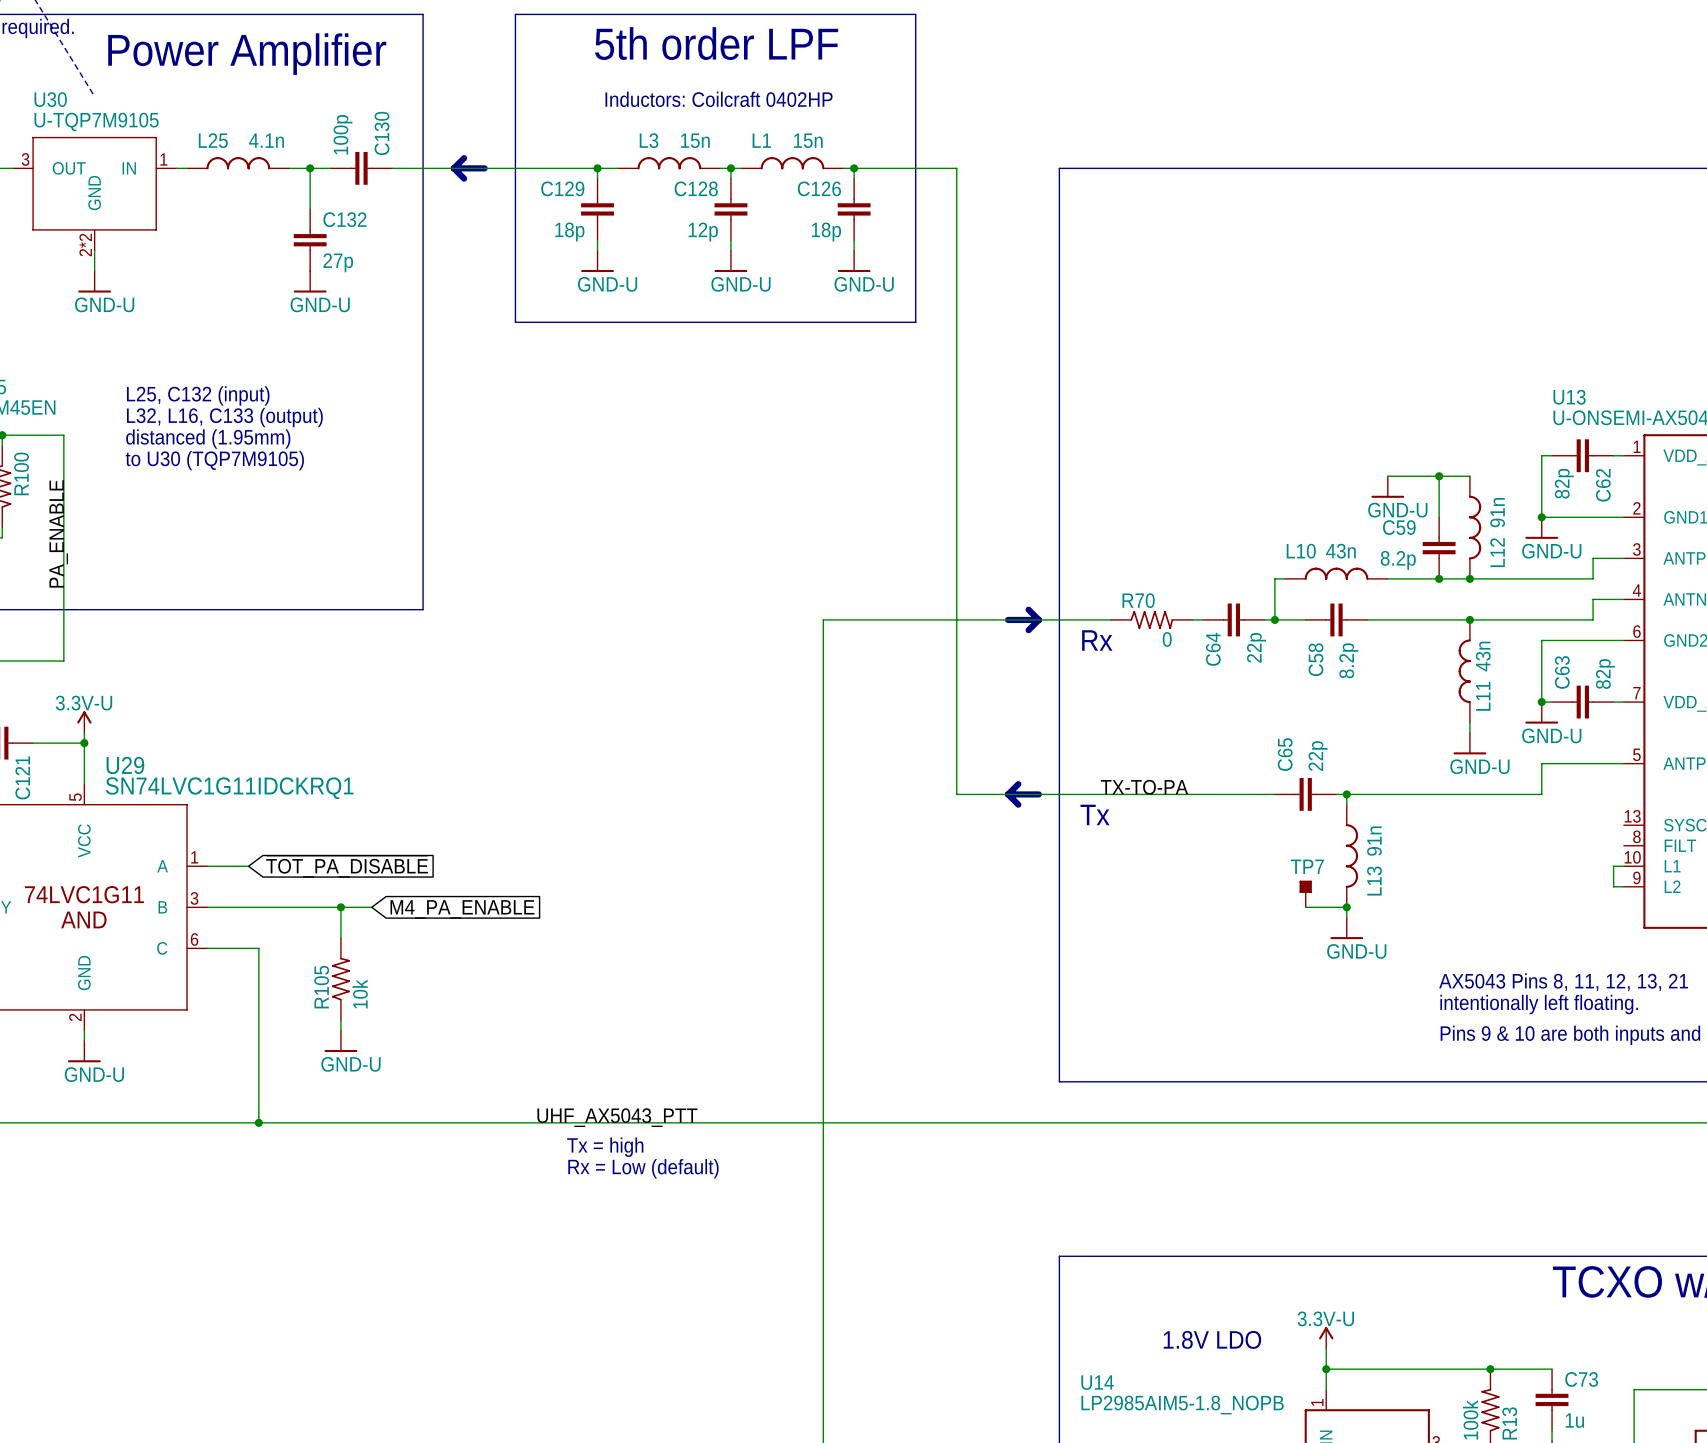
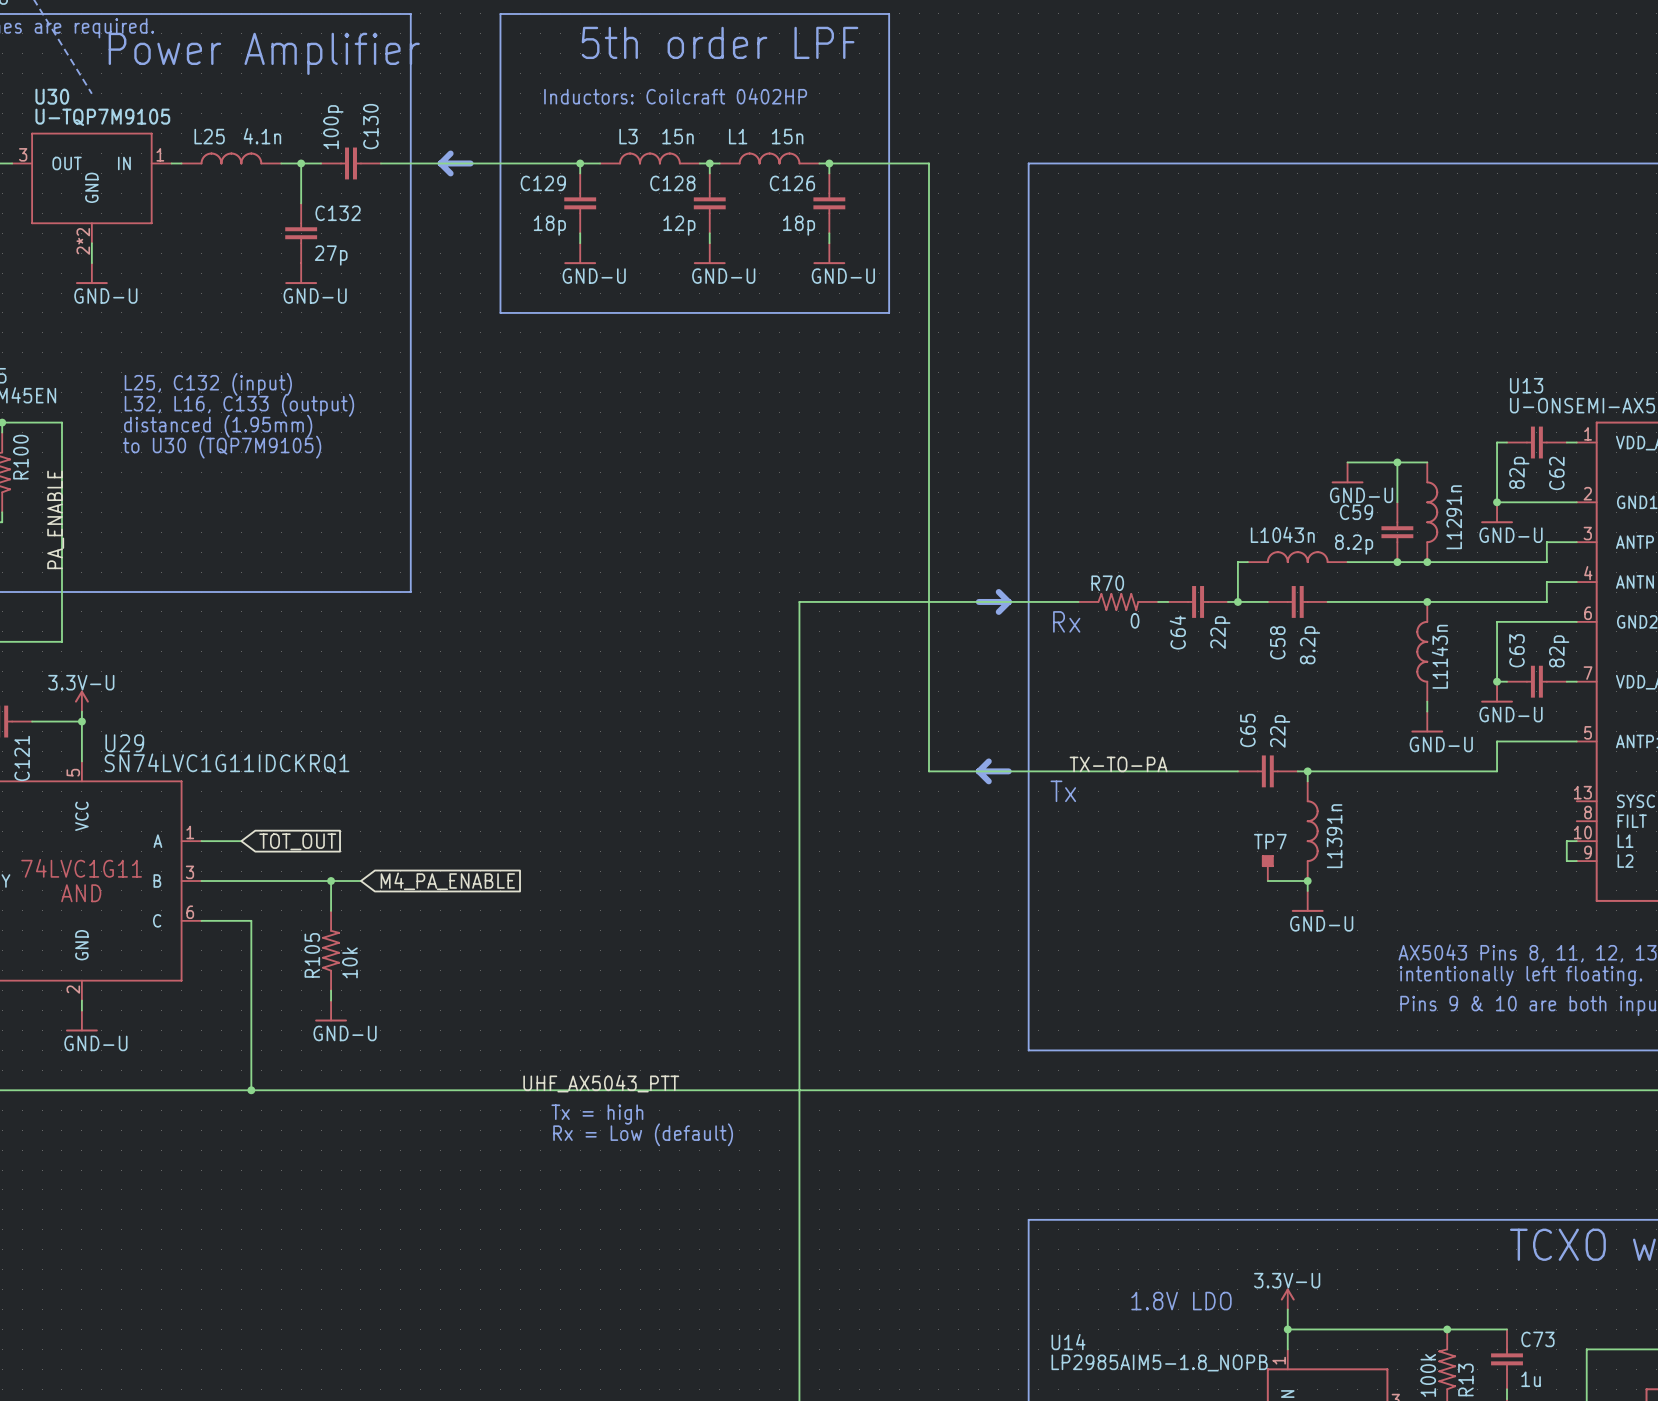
global label: ~{TOT_PA_DISABLE} (347, 866) -> TOT_OUT (297, 841)

